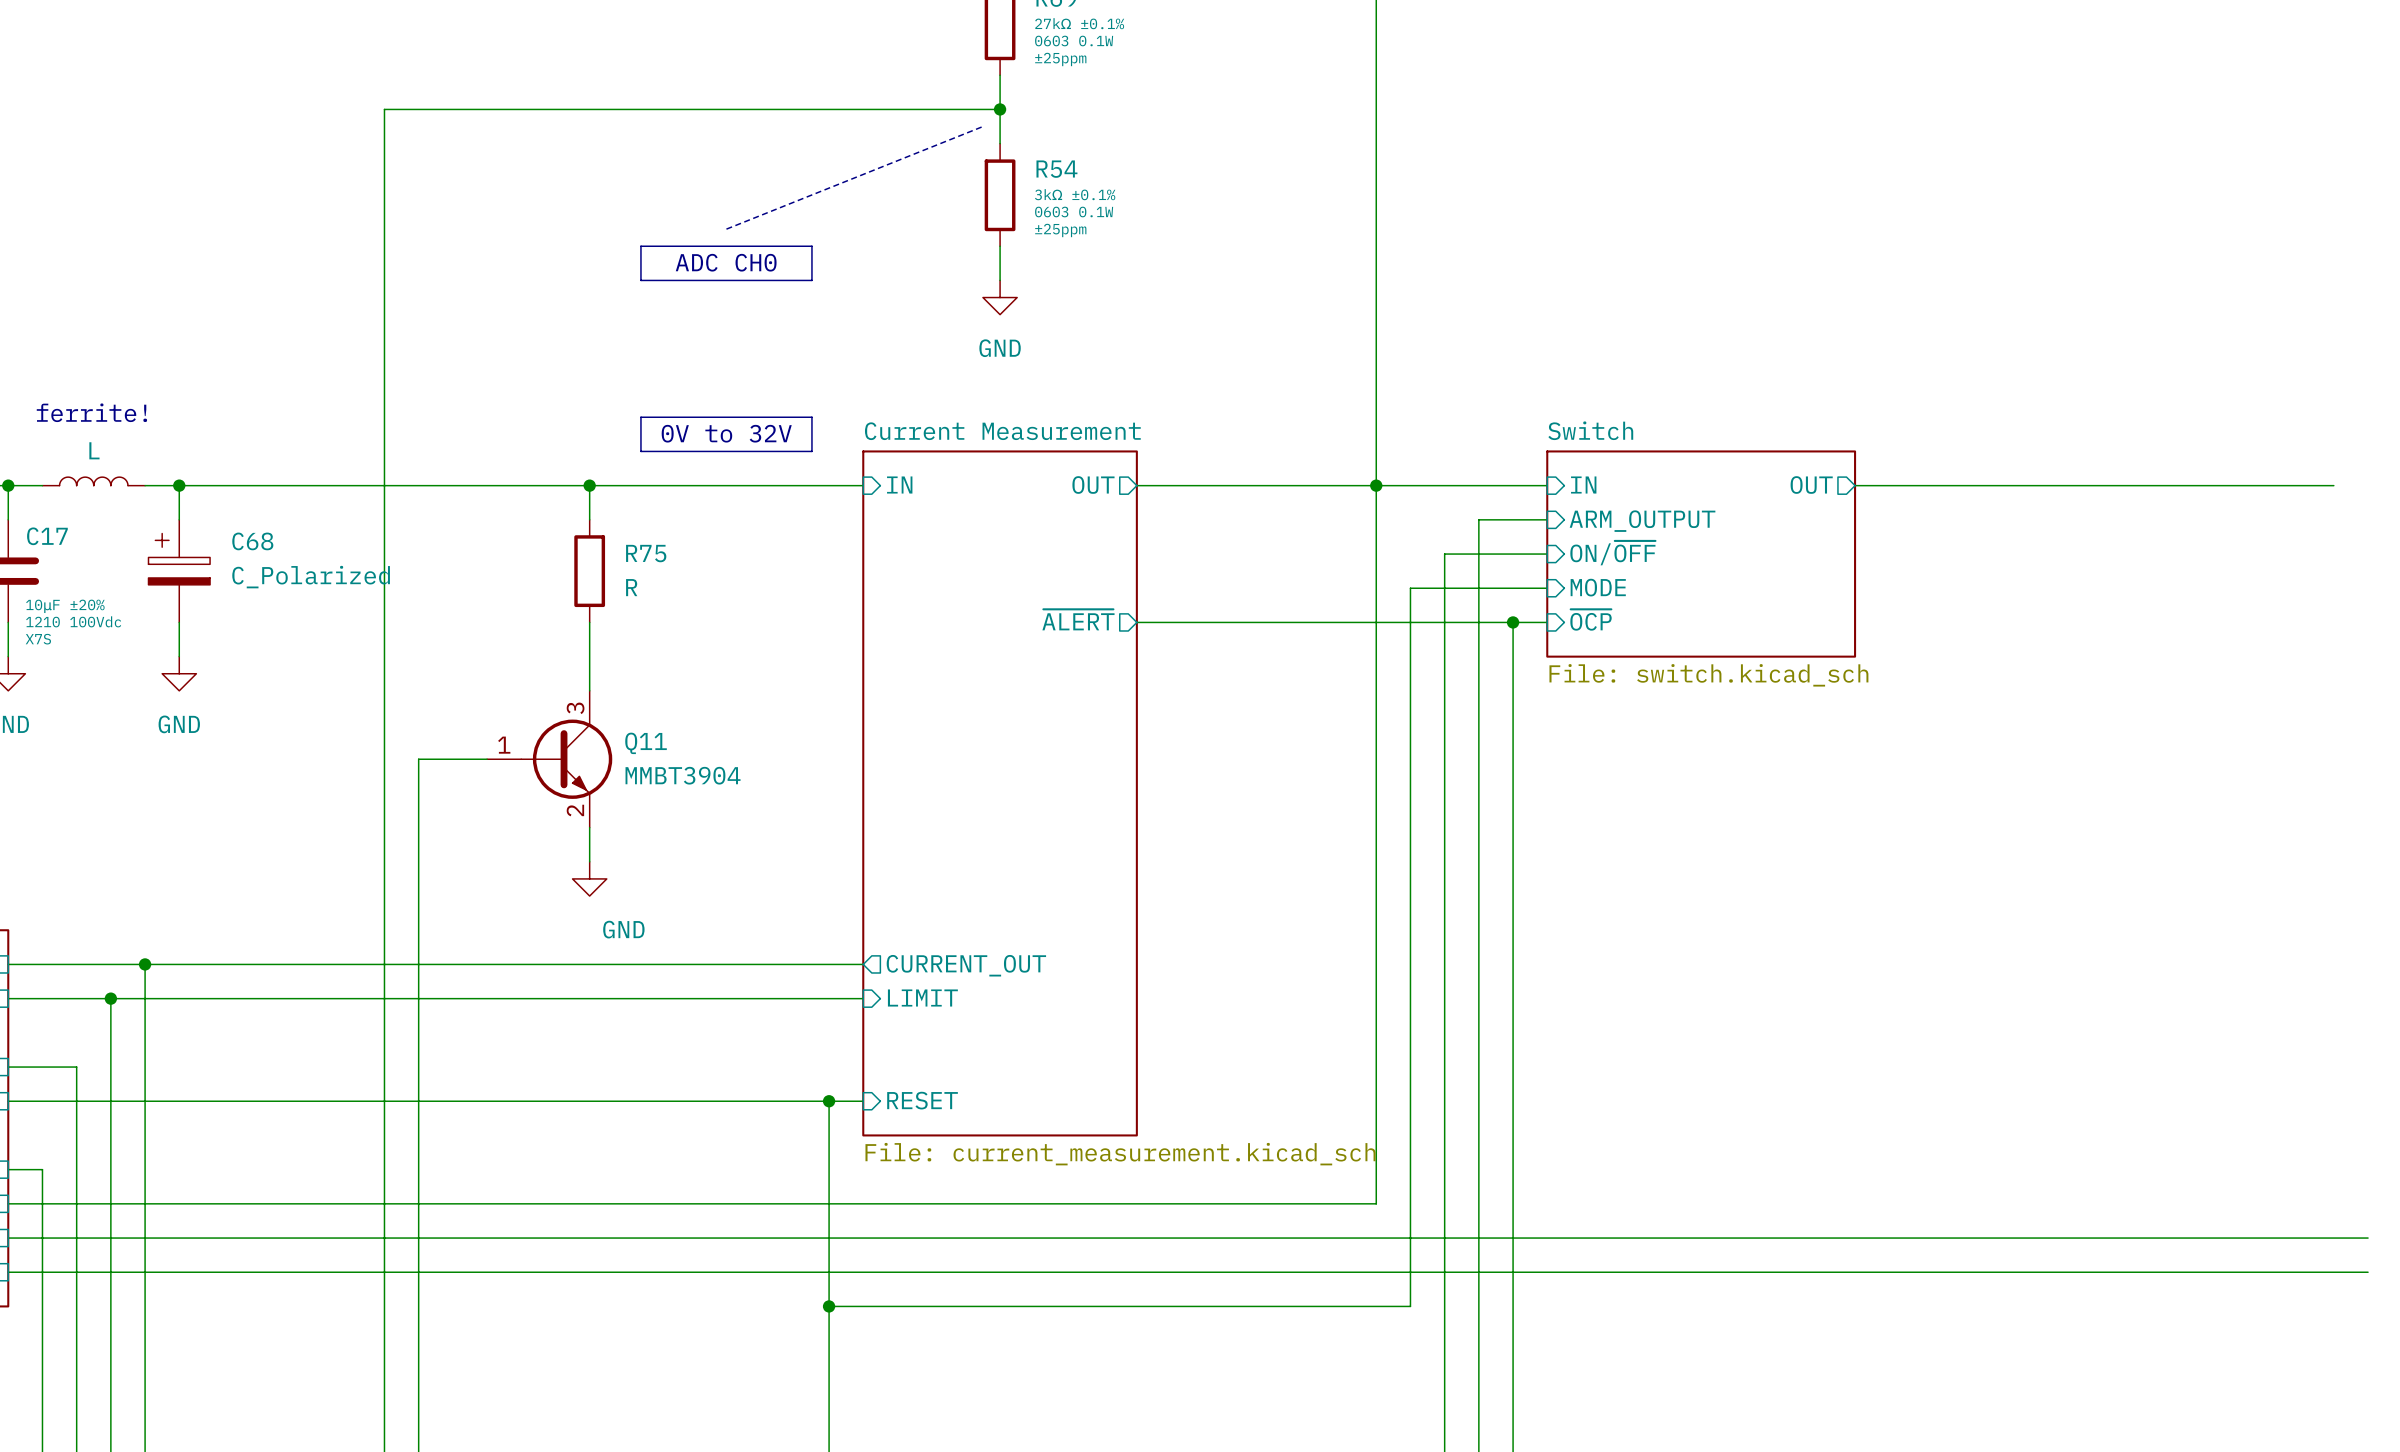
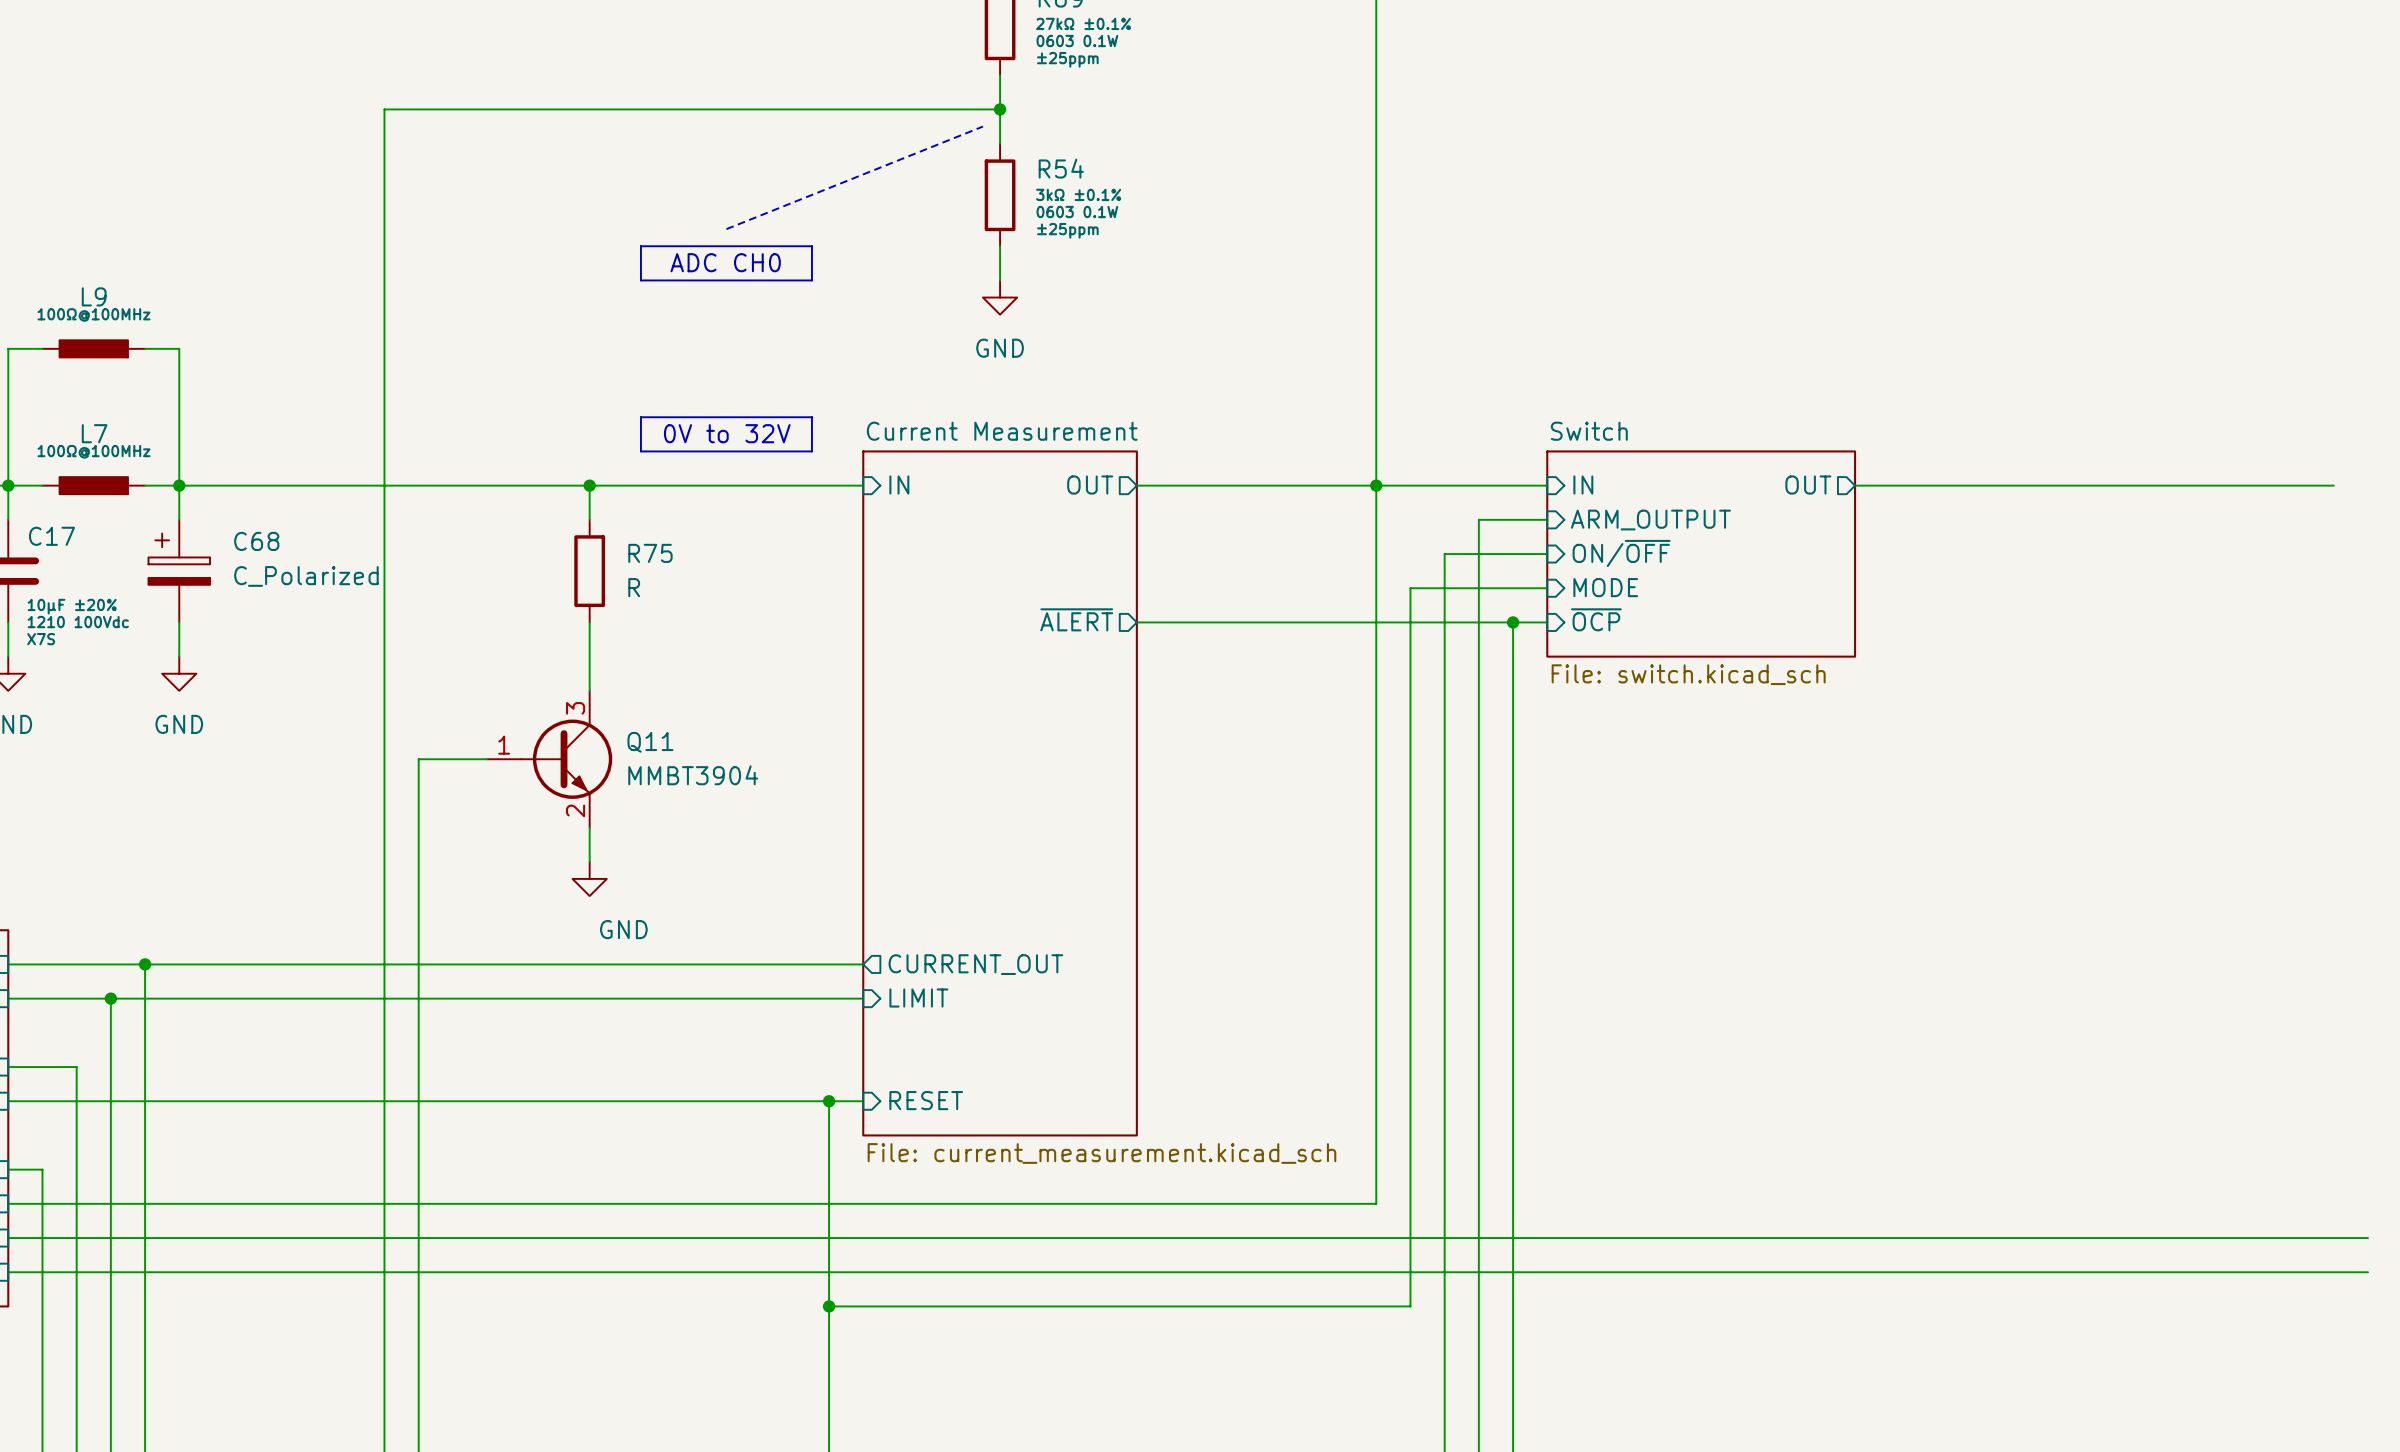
wire: none -> (42, 348) (8, 348) (8, 485)
L9: none -> 100Ω@100MHz (93, 348)
wire: none -> (145, 348) (179, 348) (179, 485)
text: ferrite! (91, 412) -> none
part: L (93, 481) -> none
L7: none -> 100Ω@100MHz (93, 485)

